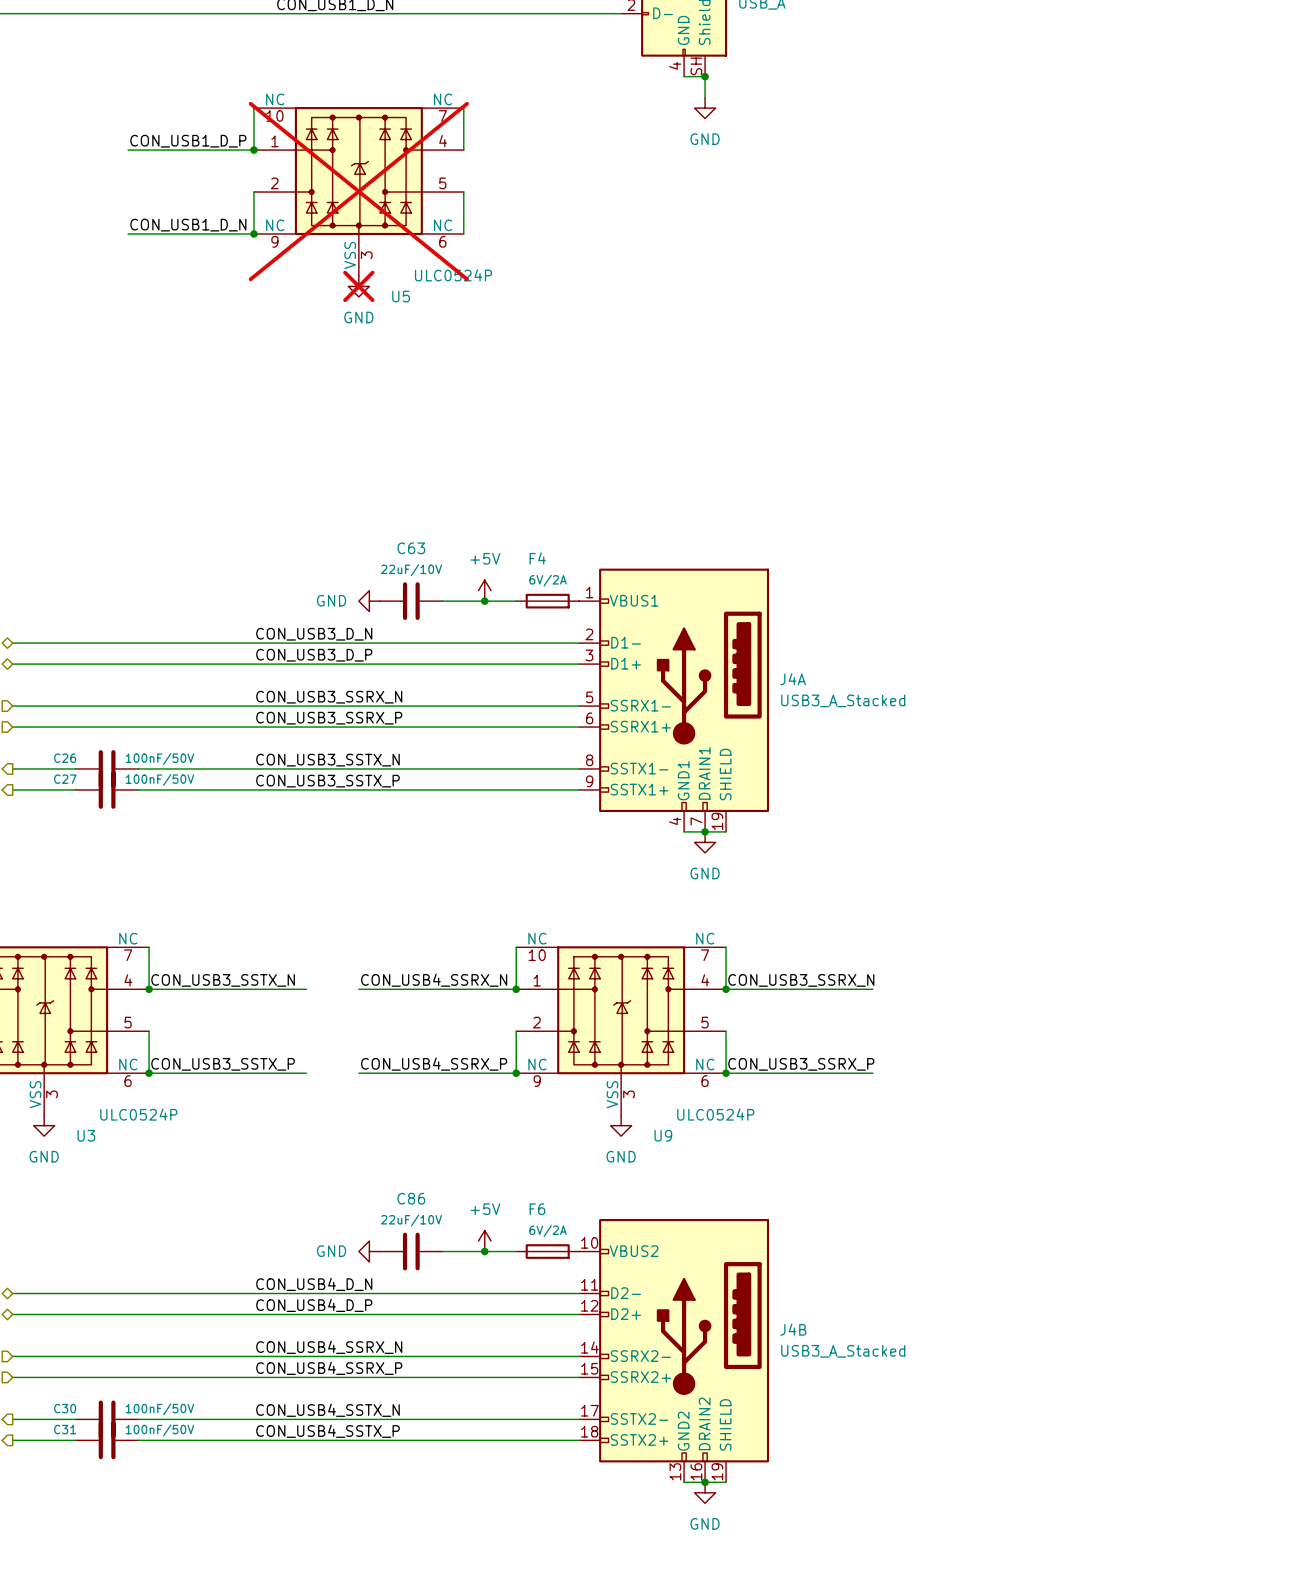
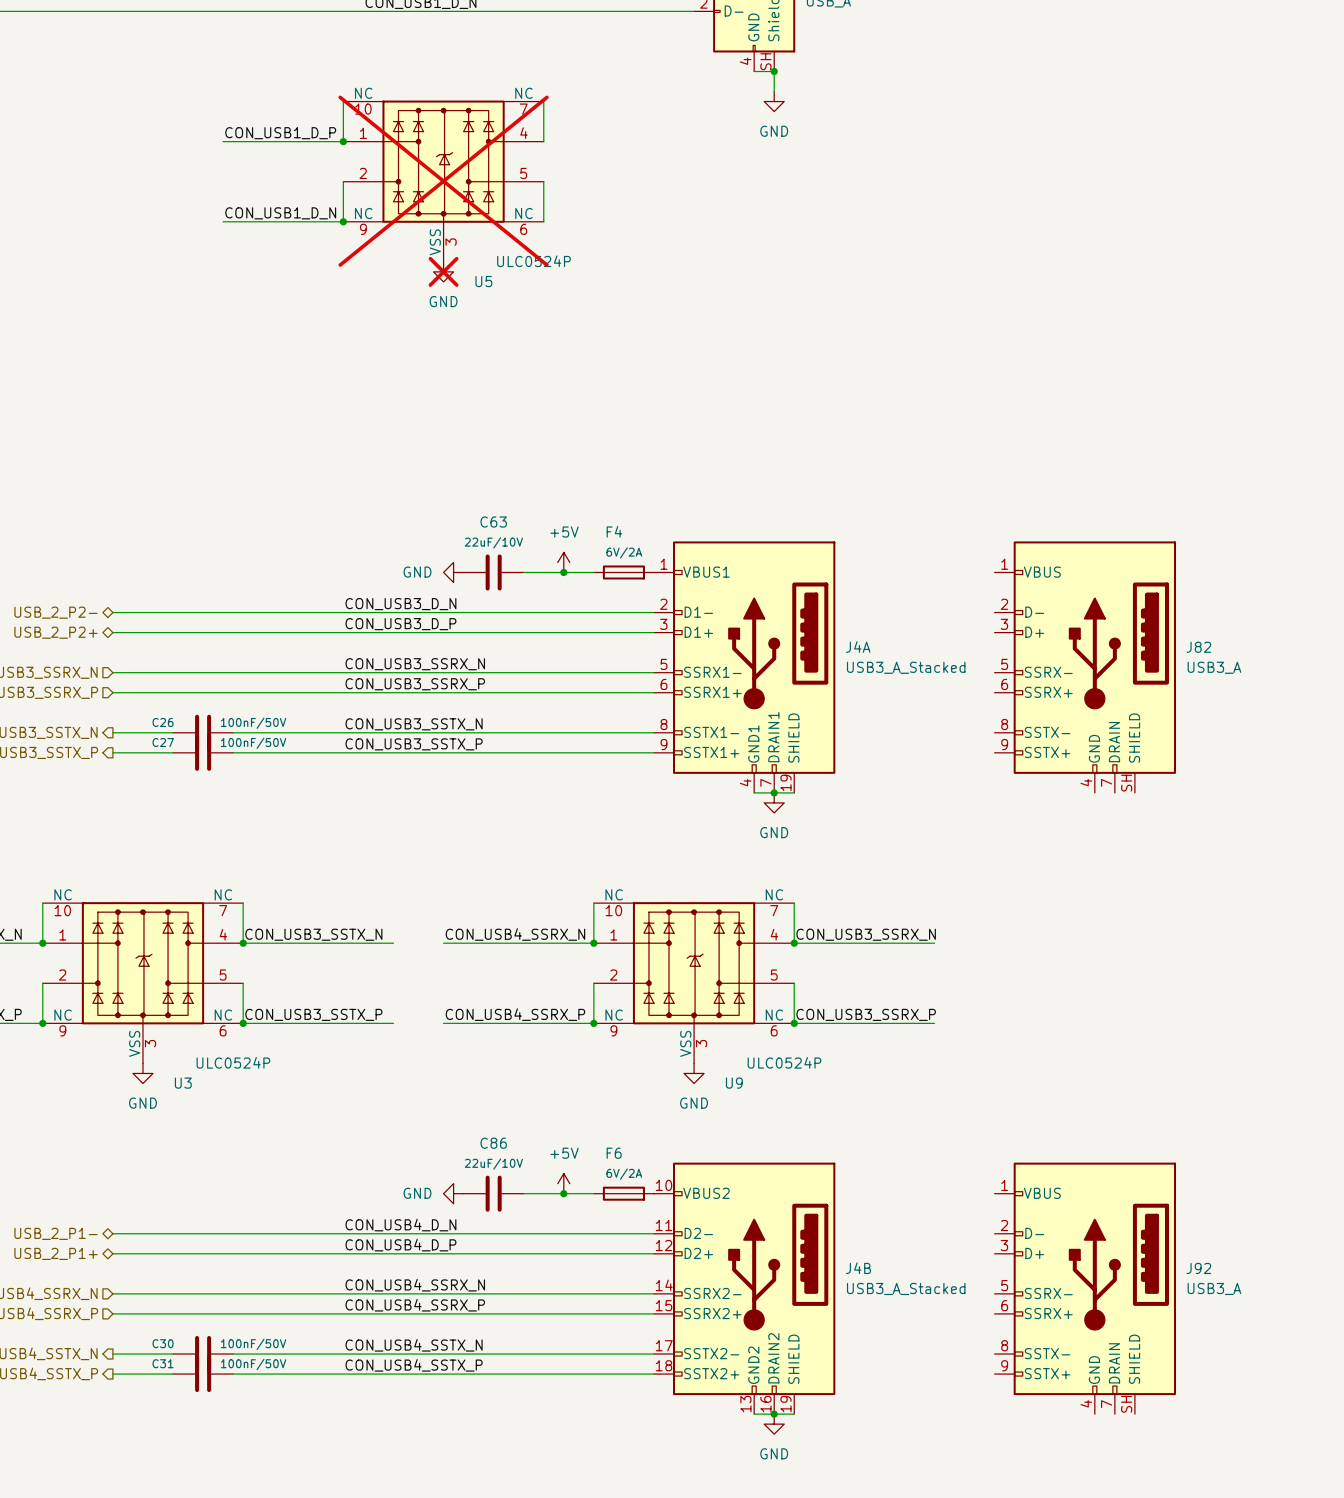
J82: none -> USB3_A (1085, 667)
J92: none -> USB3_A (1085, 1288)

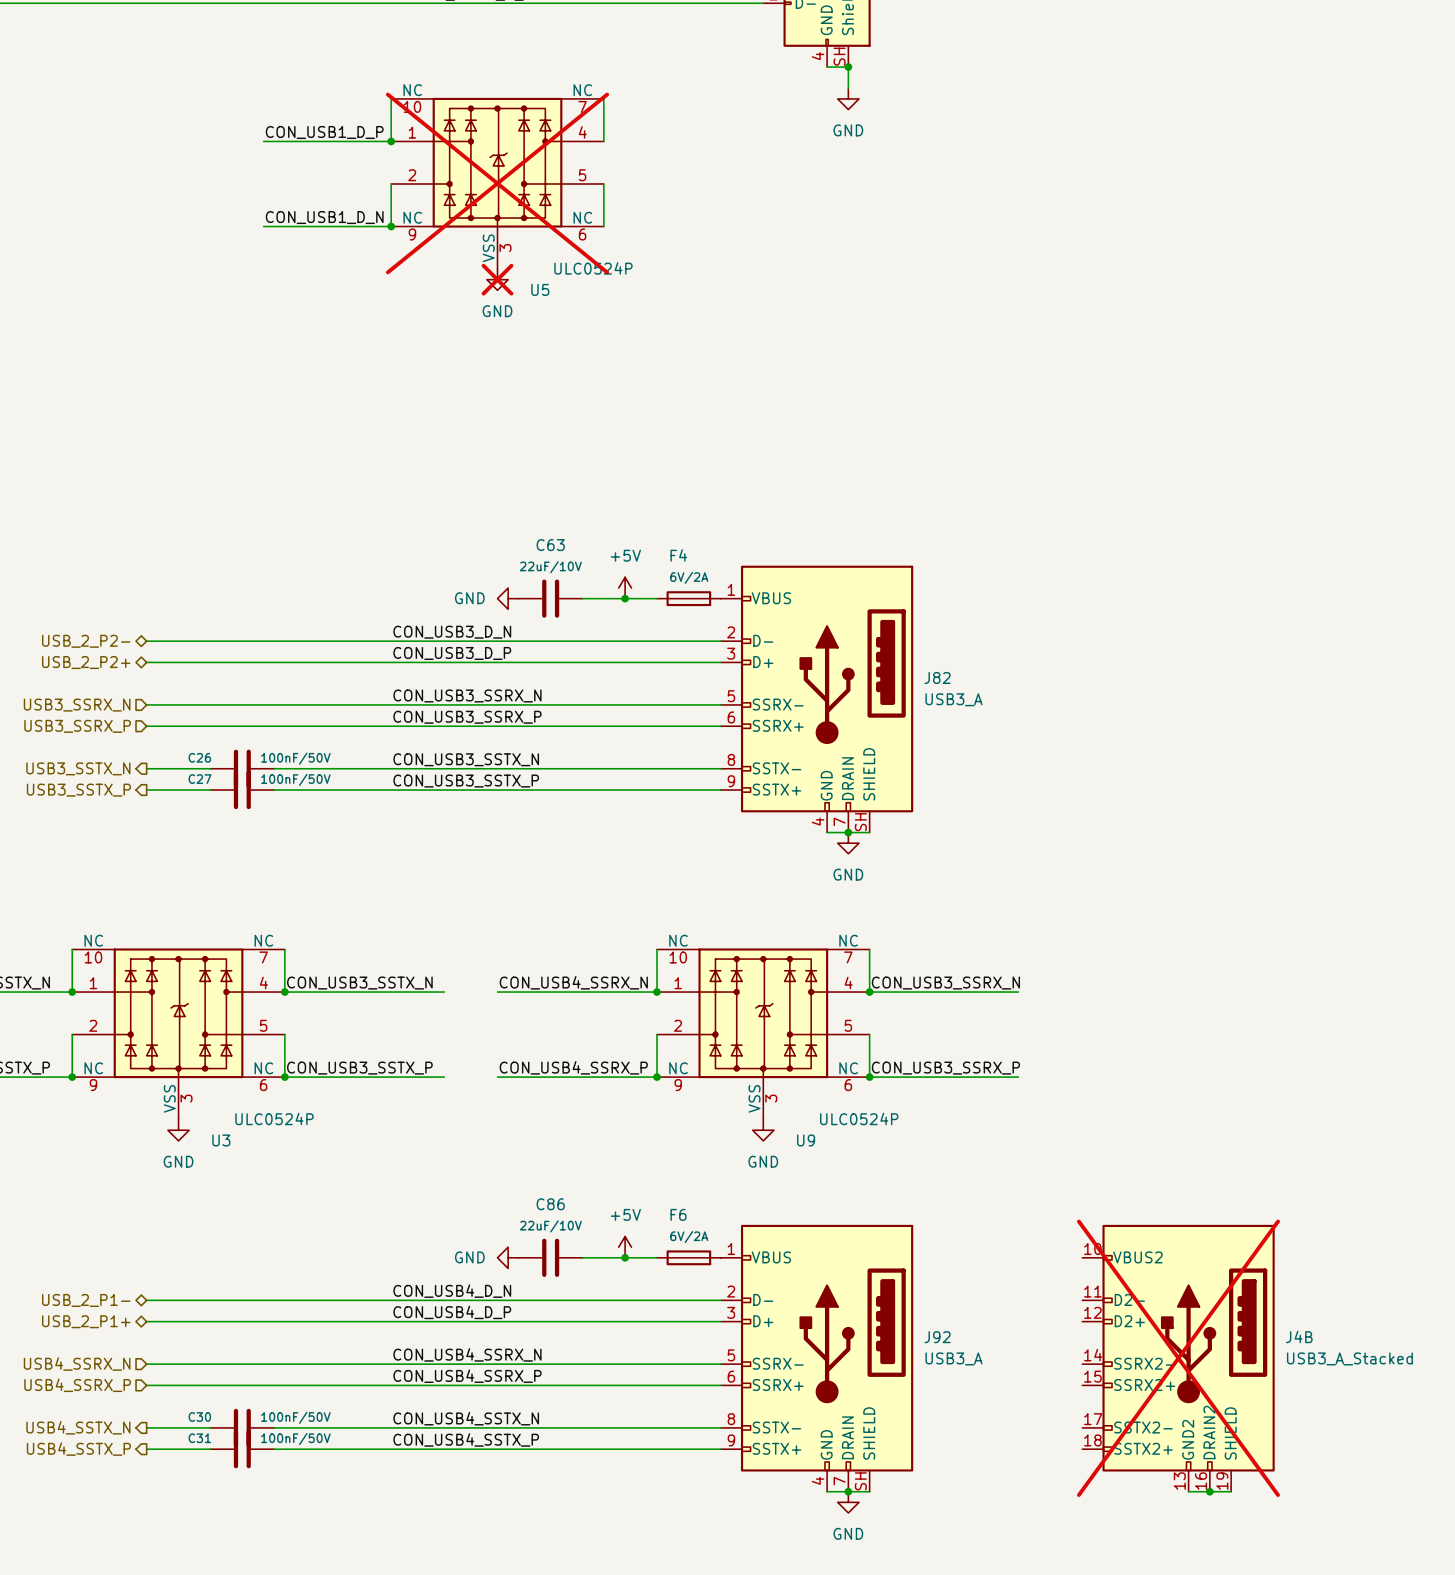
J4A: USB3_A_Stacked (744, 667) -> none
J82 position: (1085, 667) -> (816, 699)
J4B position: (744, 1288) -> (1178, 1358)
J4B do-not-place cross: none -> (1178, 1358)
J92 position: (1085, 1288) -> (816, 1358)
wire: none -> (1188, 1491) (1231, 1491)
junction: none -> (1209, 1491)

